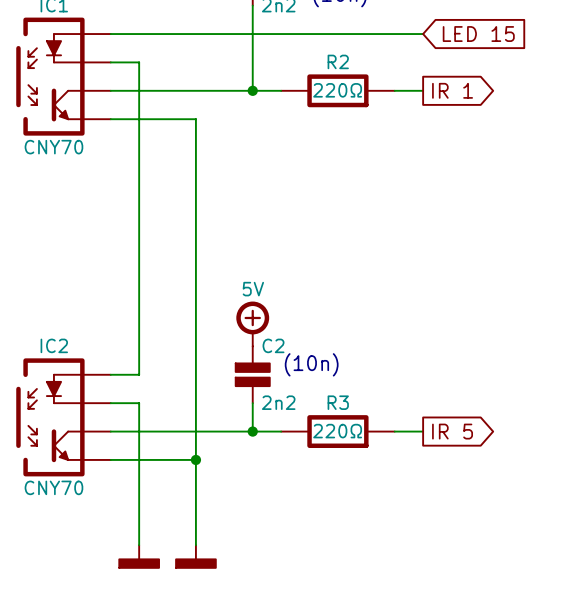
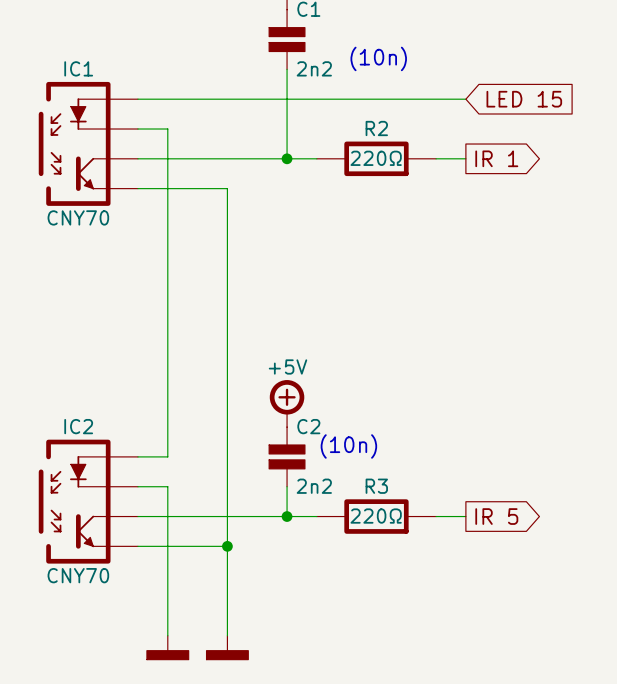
power symbol text: 5V (253, 289) -> +5V (288, 366)

